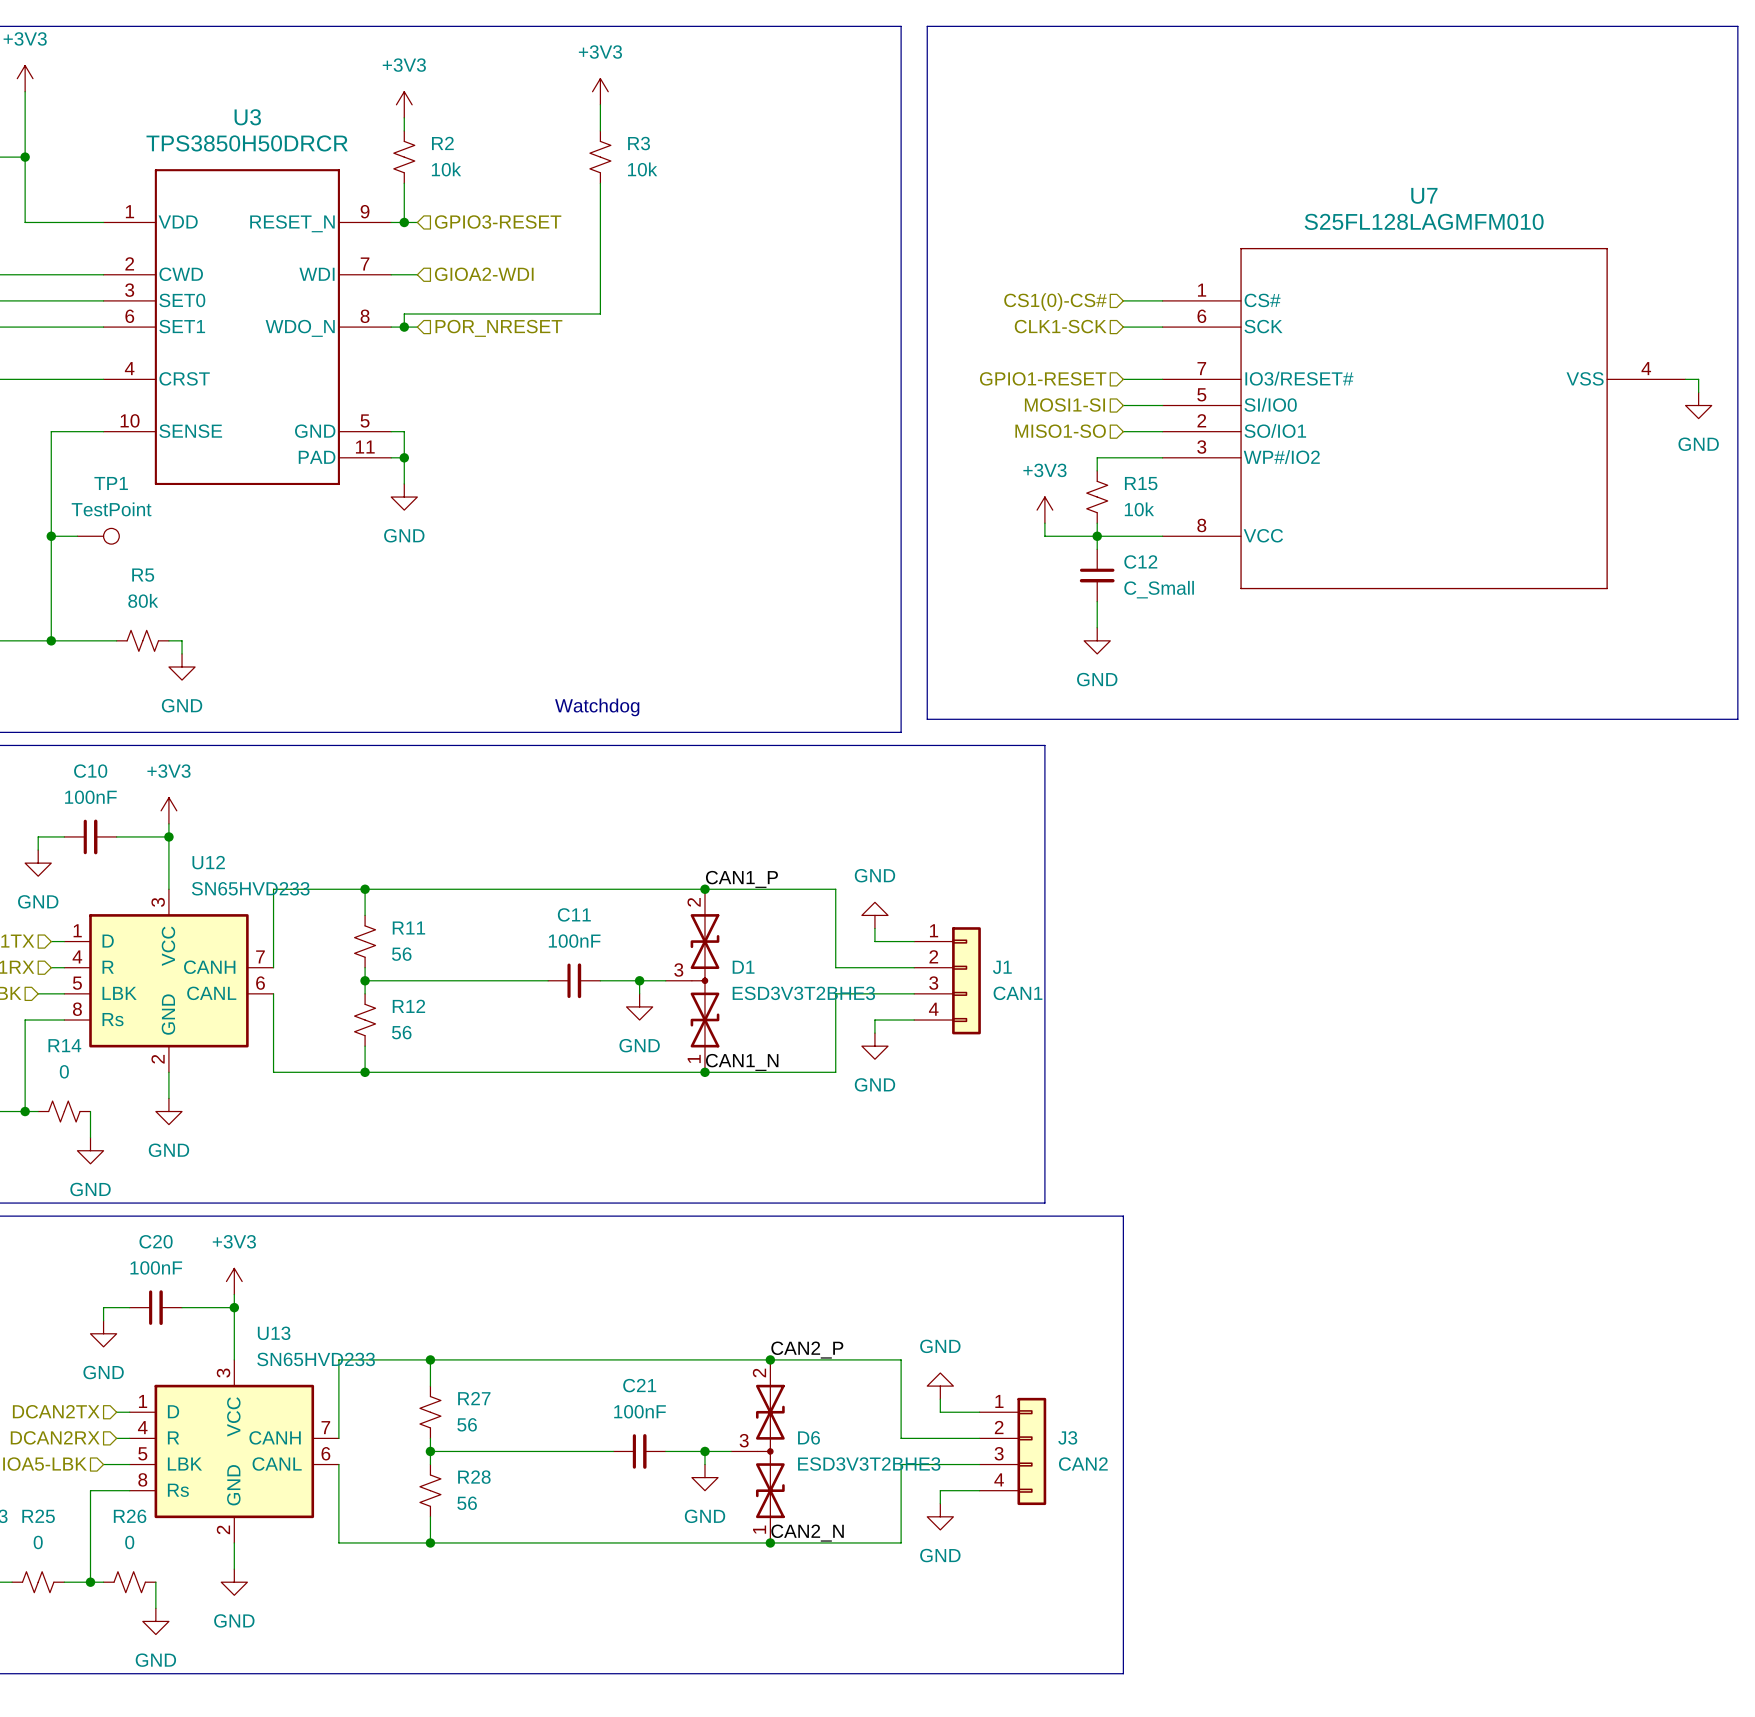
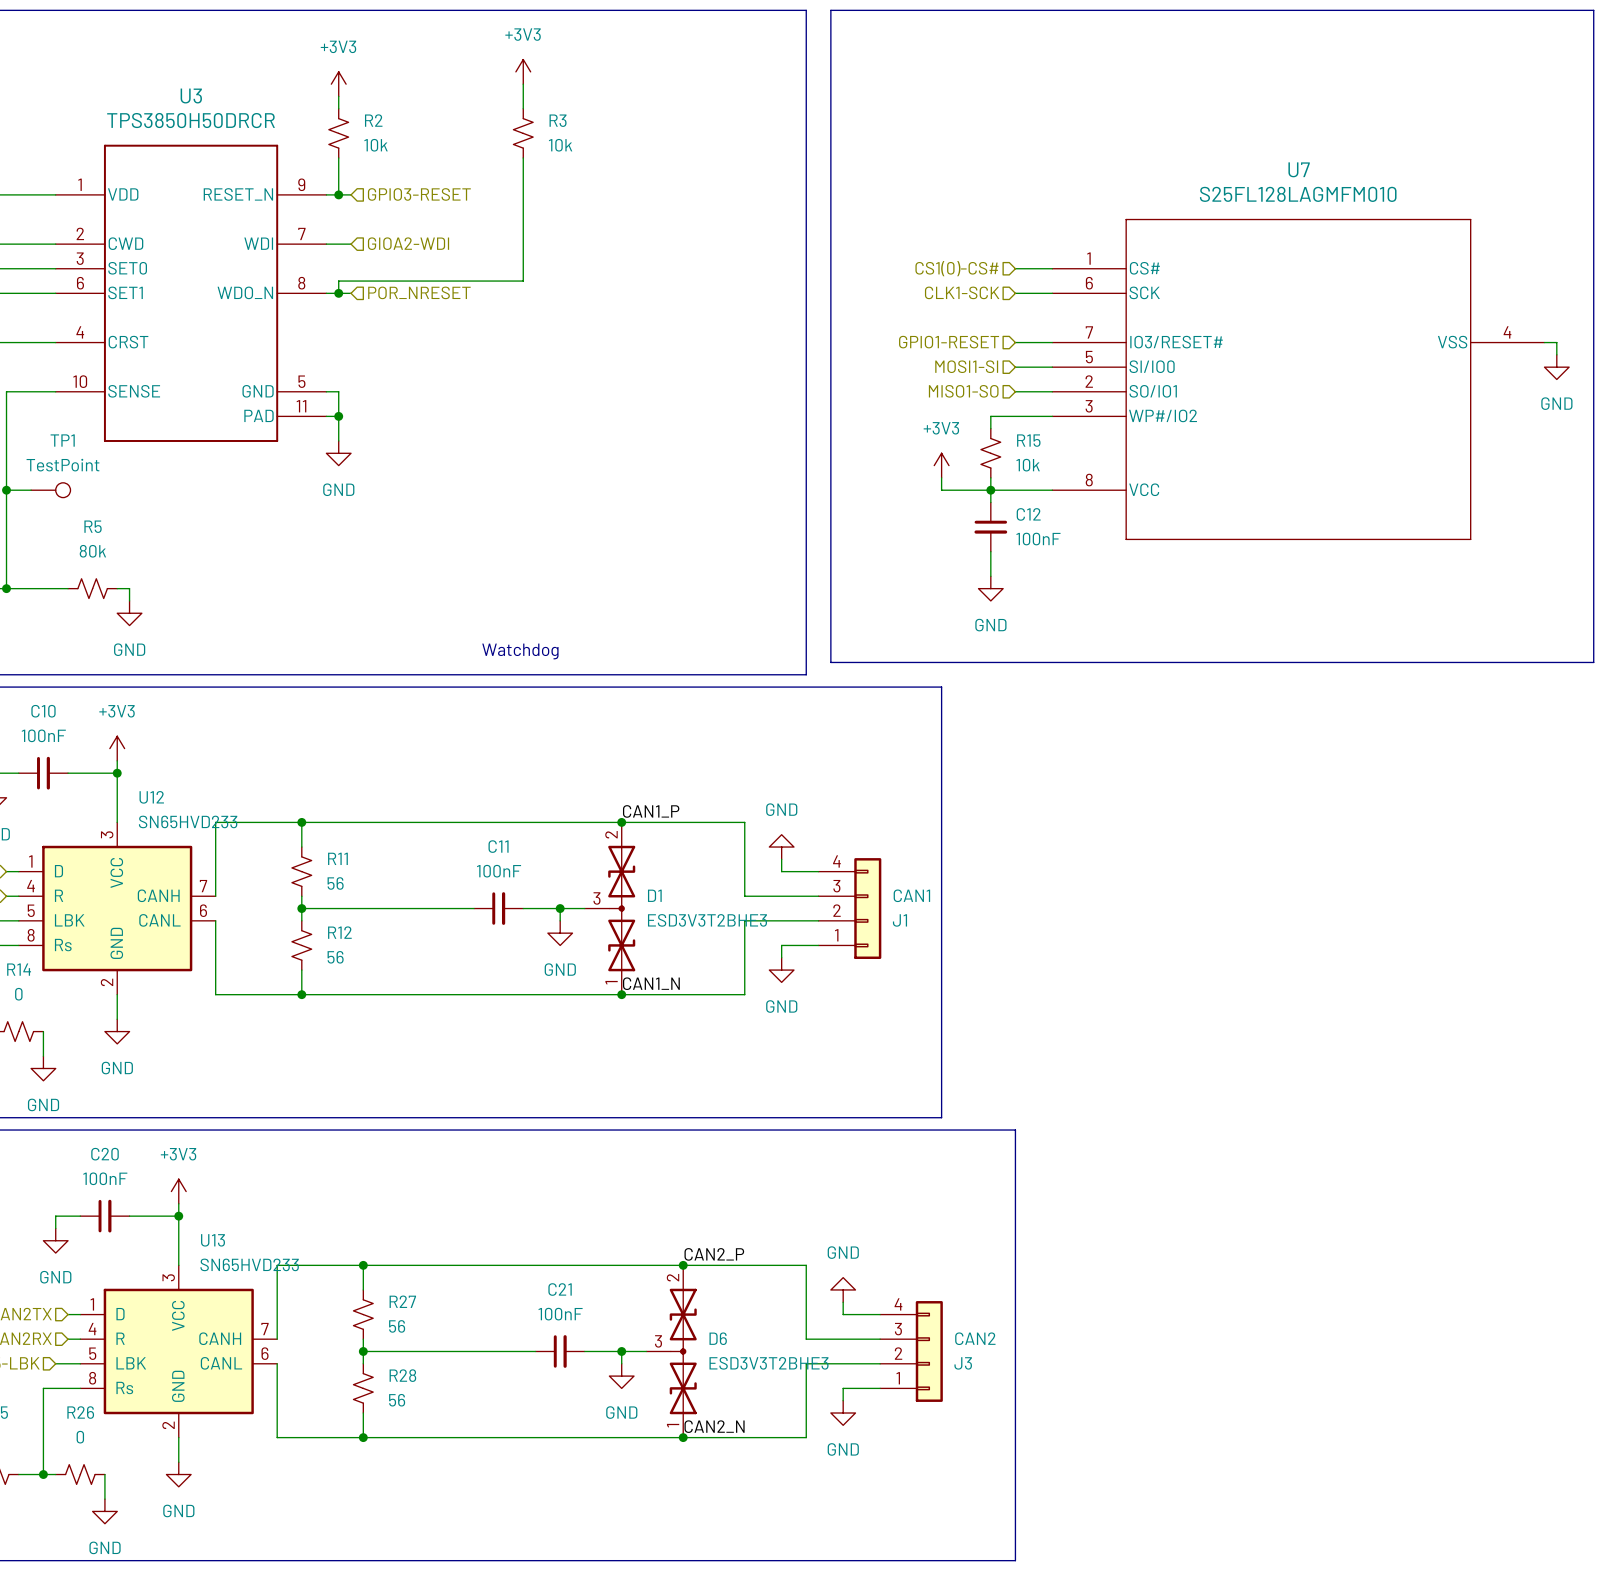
C12 value: C_Small (1159, 589) -> 100nF (1038, 539)
J1 flip: as is (966, 980) -> up-down (867, 908)
J3 flip: as is (1031, 1451) -> up-down (929, 1351)

